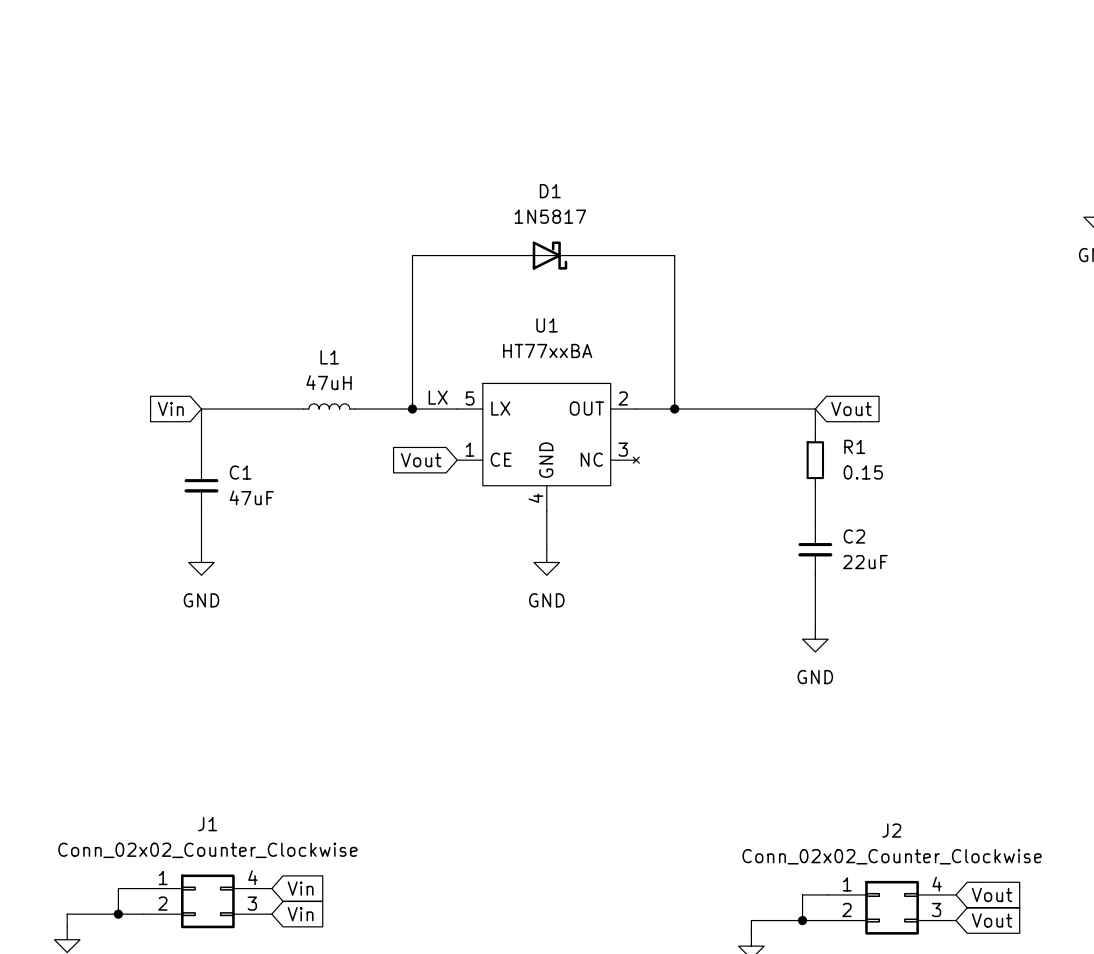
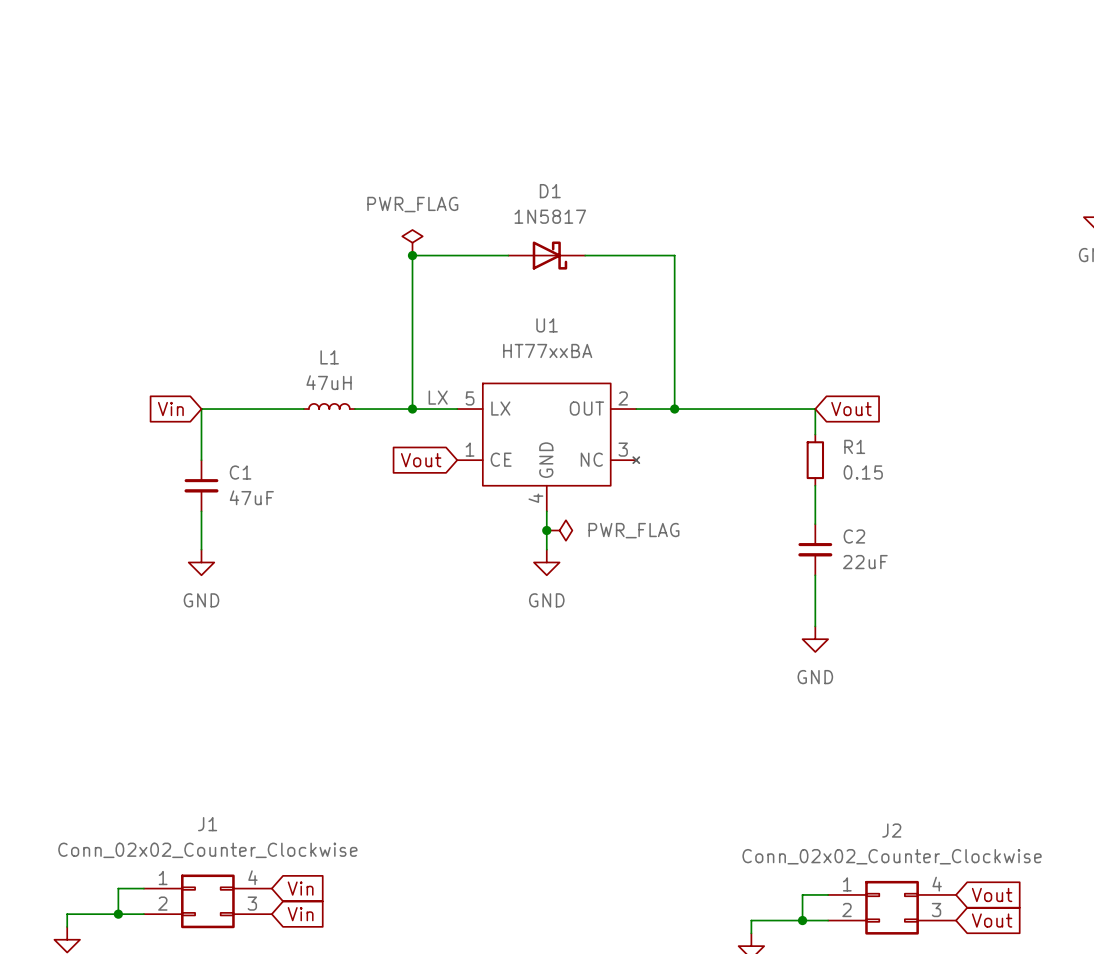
power symbol: none -> PWR_FLAG (412, 242)
junction: none -> (412, 255)
junction: none -> (546, 530)
power symbol: none -> PWR_FLAG (559, 530)

